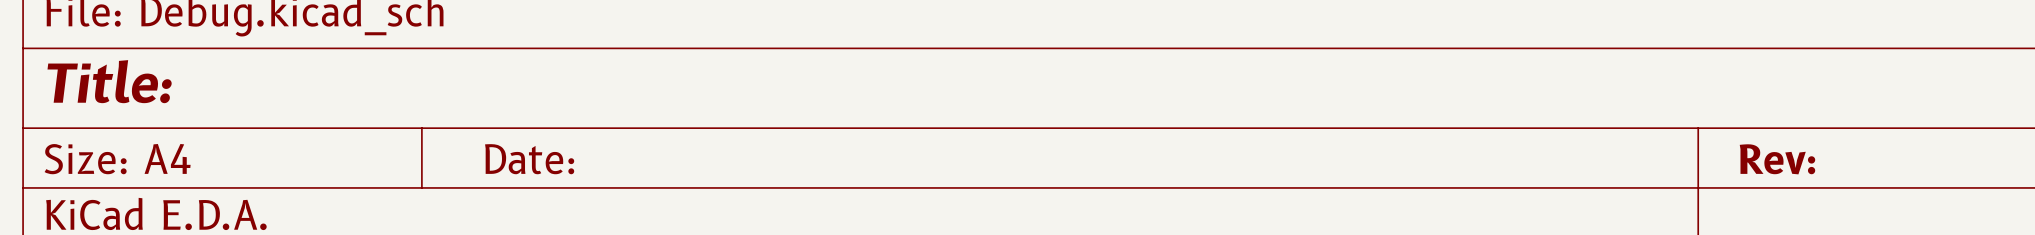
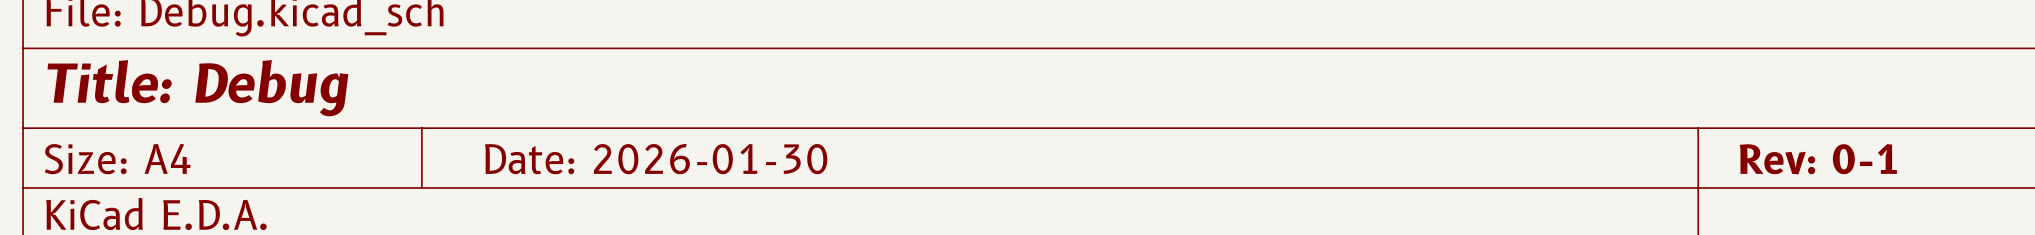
title block: Title: (109, 81) -> Title: Debug (197, 88)
title block: Date: (529, 159) -> Date: 2026-01-30 (656, 159)
title block: Rev: (1777, 159) -> Rev: 0-1 (1818, 159)

